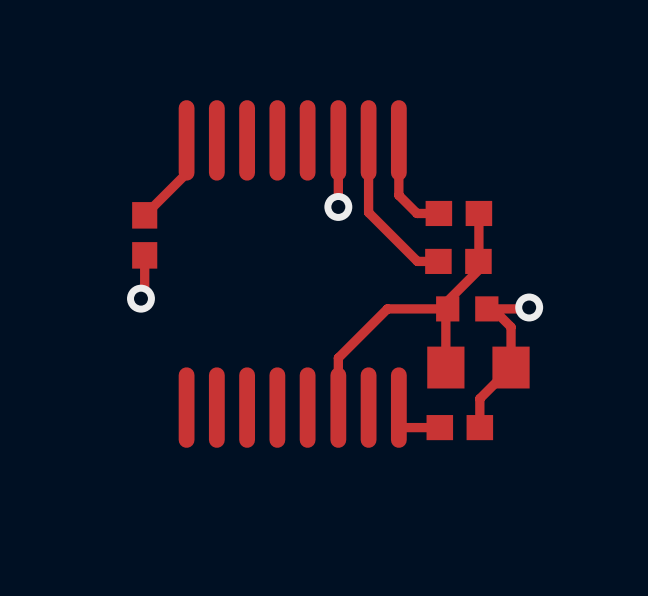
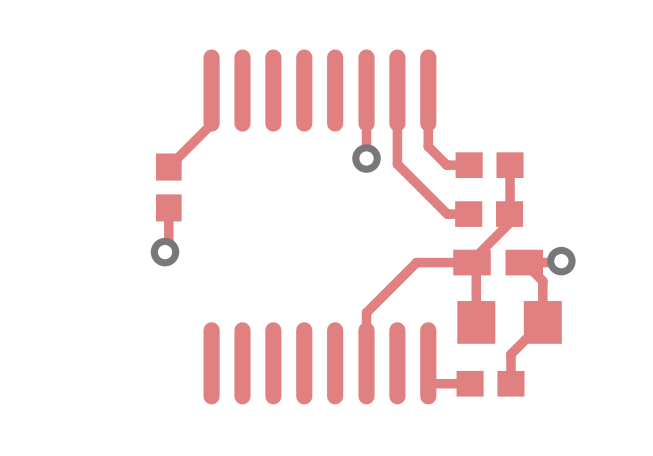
part footprint: [436, 296, 499, 322] -> [453, 249, 544, 276]

